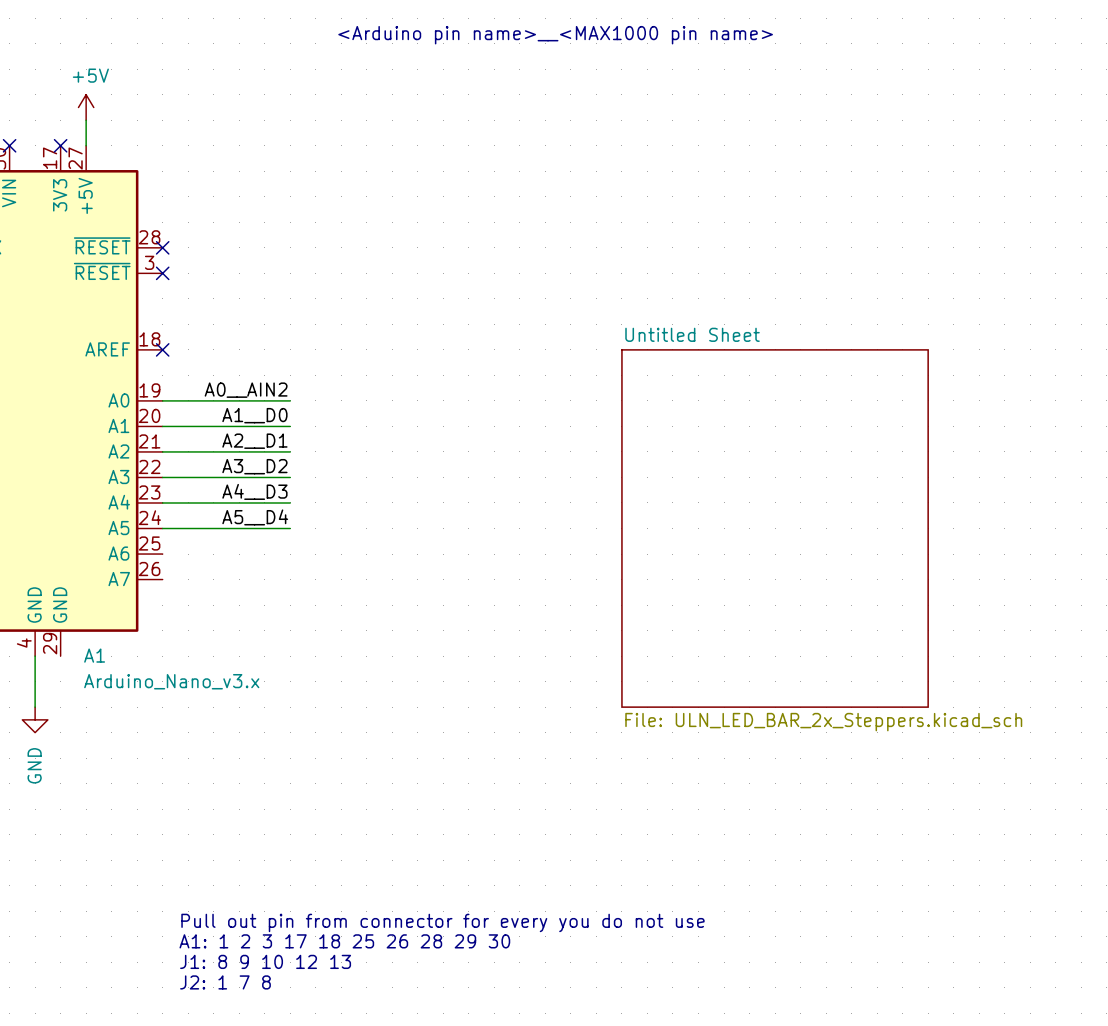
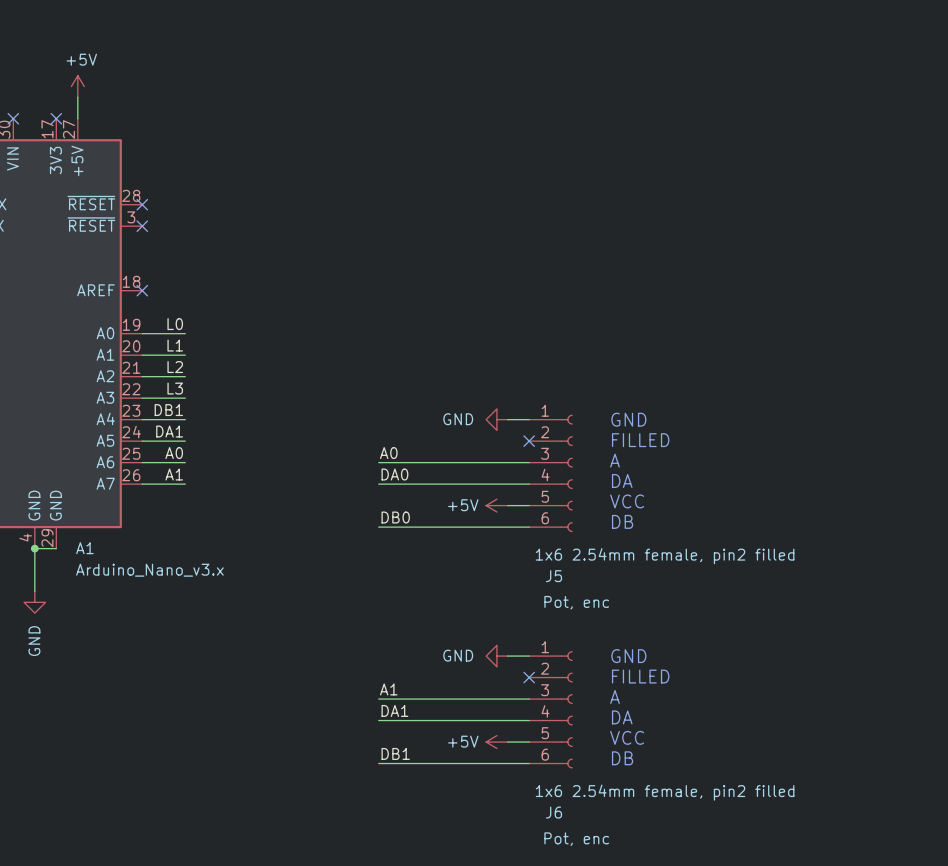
text: <Arduino pin name>__<MAX1000 pin name> (555, 35) -> none
label: none -> L0 (175, 324)
label: A0__AIN2 (246, 390) -> none
wire: (213, 400) (290, 400) -> none
label: none -> L1 (175, 345)
label: A1__D0 (254, 415) -> none
wire: (213, 426) (290, 426) -> none
label: none -> L2 (175, 367)
label: A2__D1 (254, 441) -> none
wire: (213, 451) (290, 451) -> none
label: none -> L3 (175, 388)
label: A3__D2 (254, 466) -> none
wire: (213, 477) (290, 477) -> none
label: none -> DB1 (168, 410)
label: A4__D3 (254, 491) -> none
wire: (213, 502) (290, 502) -> none
power symbol: none -> GND (496, 419)
wire: none -> (507, 419) (529, 419)
text: none -> GND (628, 419)
label: none -> DA1 (169, 431)
label: A5__D4 (255, 517) -> none
text: none -> FILLED (640, 440)
wire: (213, 528) (290, 528) -> none
no-connect mark: none -> (529, 441)
sheet Untitled Sheet: File: ULN_LED_BAR_2x_Steppers.kicad_sch (775, 528) -> none
label: none -> A0 (174, 453)
label: none -> A0 (388, 453)
text: none -> A (614, 460)
wire: none -> (142, 462) (185, 462)
wire: none -> (378, 462) (529, 462)
J5: none -> 1x6 2.54mm female, pin2 filled (550, 473)
label: none -> A1 (174, 474)
label: none -> DA0 (394, 474)
text: none -> DA (622, 481)
wire: none -> (142, 484) (185, 484)
wire: none -> (378, 484) (529, 484)
text: none -> VCC (627, 501)
power symbol: none -> +5V (496, 505)
wire: none -> (507, 505) (529, 505)
label: none -> DB0 (395, 517)
text: none -> DB (622, 521)
wire: none -> (378, 527) (529, 527)
wire: none -> (34, 548) (56, 548)
junction: none -> (34, 548)
power symbol: none -> GND (496, 656)
wire: none -> (507, 656) (529, 656)
text: none -> GND (628, 656)
text: none -> FILLED (640, 676)
no-connect mark: none -> (529, 677)
label: none -> A1 (388, 689)
text: none -> A (614, 696)
wire: none -> (378, 699) (529, 699)
J6: none -> 1x6 2.54mm female, pin2 filled (550, 709)
label: none -> DA1 (394, 710)
text: none -> DA (622, 717)
wire: none -> (378, 720) (529, 720)
text: none -> VCC (627, 737)
power symbol: none -> +5V (496, 742)
wire: none -> (507, 742) (529, 742)
label: none -> DB1 (395, 753)
text: none -> DB (622, 758)
wire: none -> (378, 763) (529, 763)
text: Pull out pin from connector for every you do not use (442, 922) -> none
text: A1: 1 2 3 17 18 25 26 28 29 30 (344, 941) -> none
text: J1: 8 9 10 12 13 (265, 961) -> none
text: J2: 1 7 8 (225, 982) -> none

